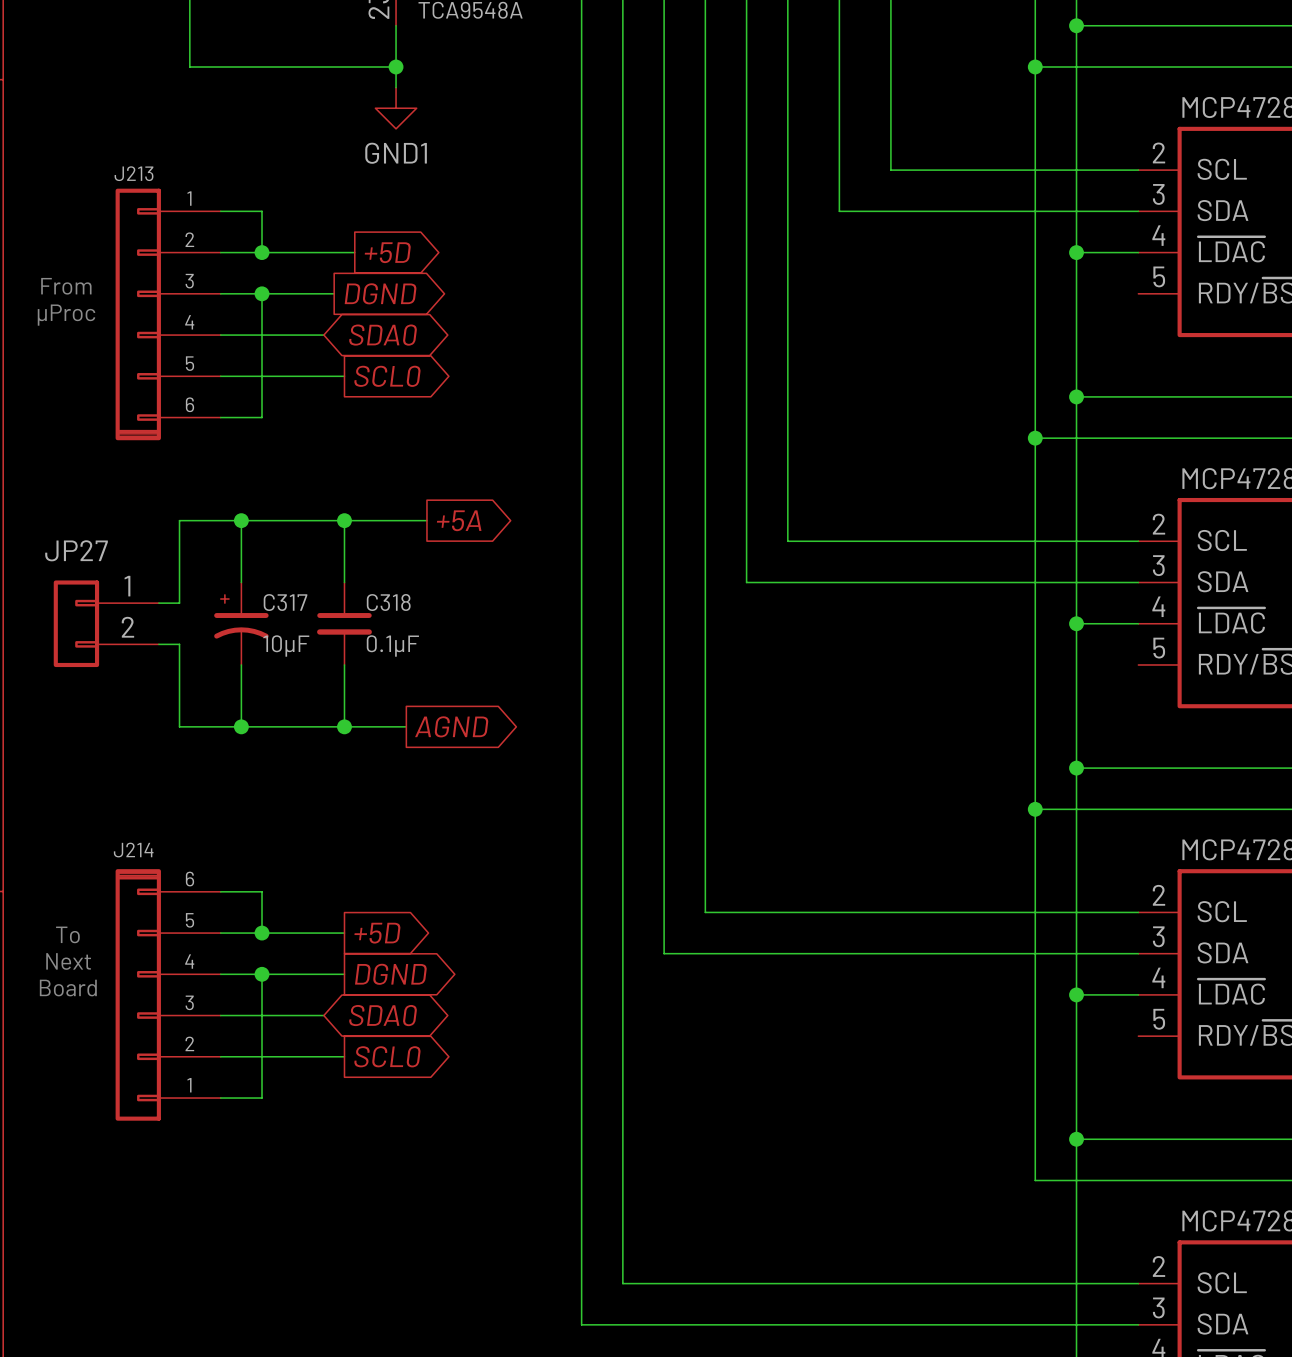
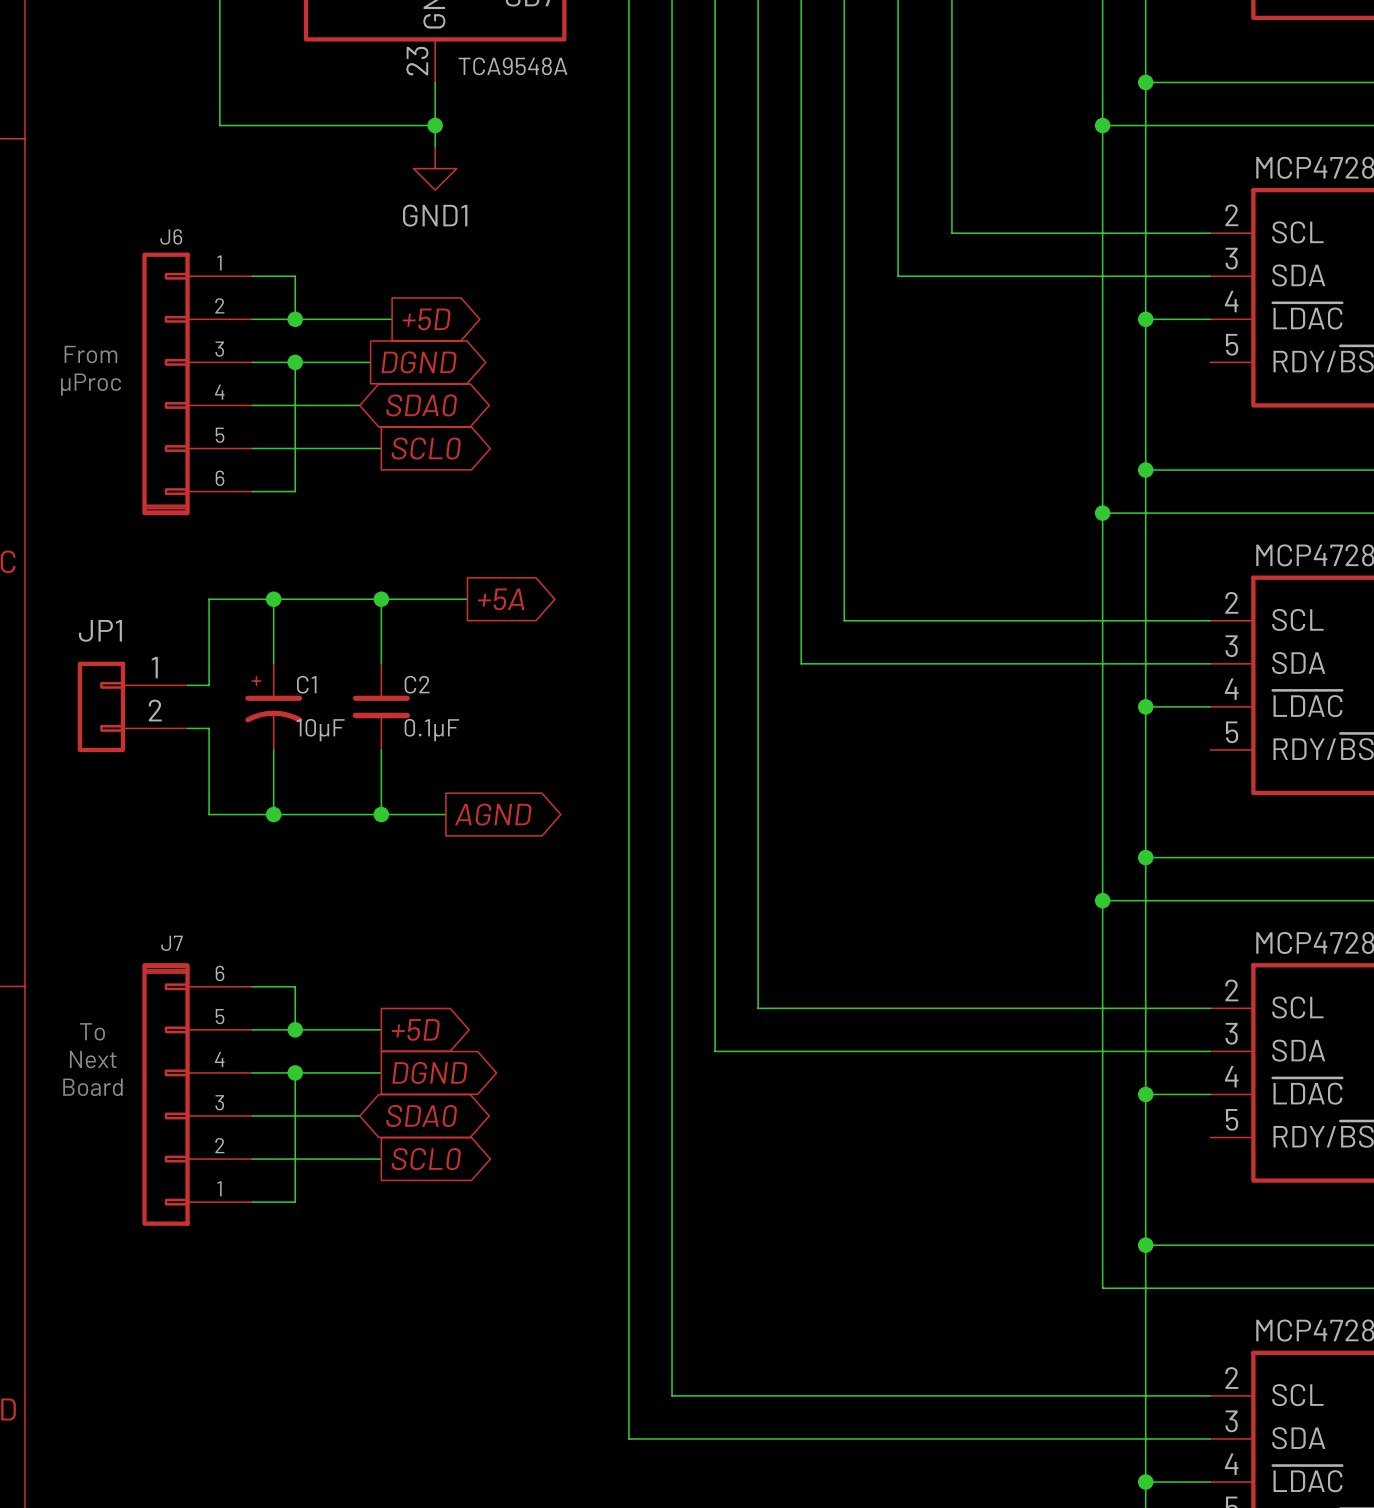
J213 name: J213 (134, 173) -> J6 (171, 236)
JP27 name: JP27 (76, 550) -> JP1 (100, 630)
C317 name: C317 (285, 602) -> C1 (306, 684)
C318 name: C318 (388, 602) -> C2 (417, 684)
J214 name: J214 (133, 850) -> J7 (172, 943)

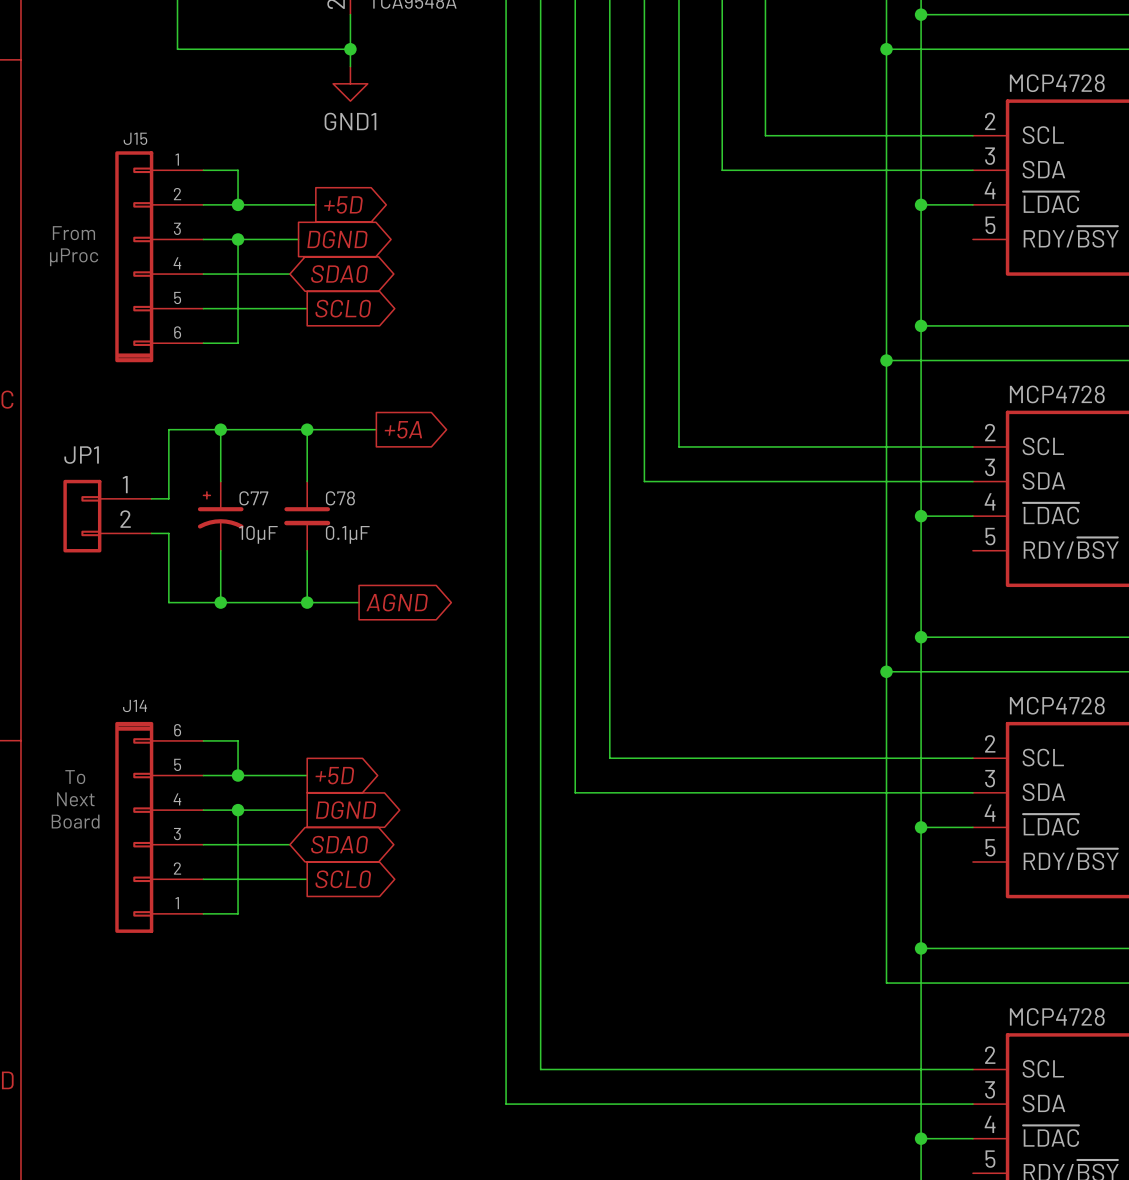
J6 name: J6 (171, 236) -> J15 (135, 138)
C1 name: C1 (306, 684) -> C77 (253, 498)
C2 name: C2 (417, 684) -> C78 (340, 498)
J7 name: J7 (172, 943) -> J14 (135, 705)

